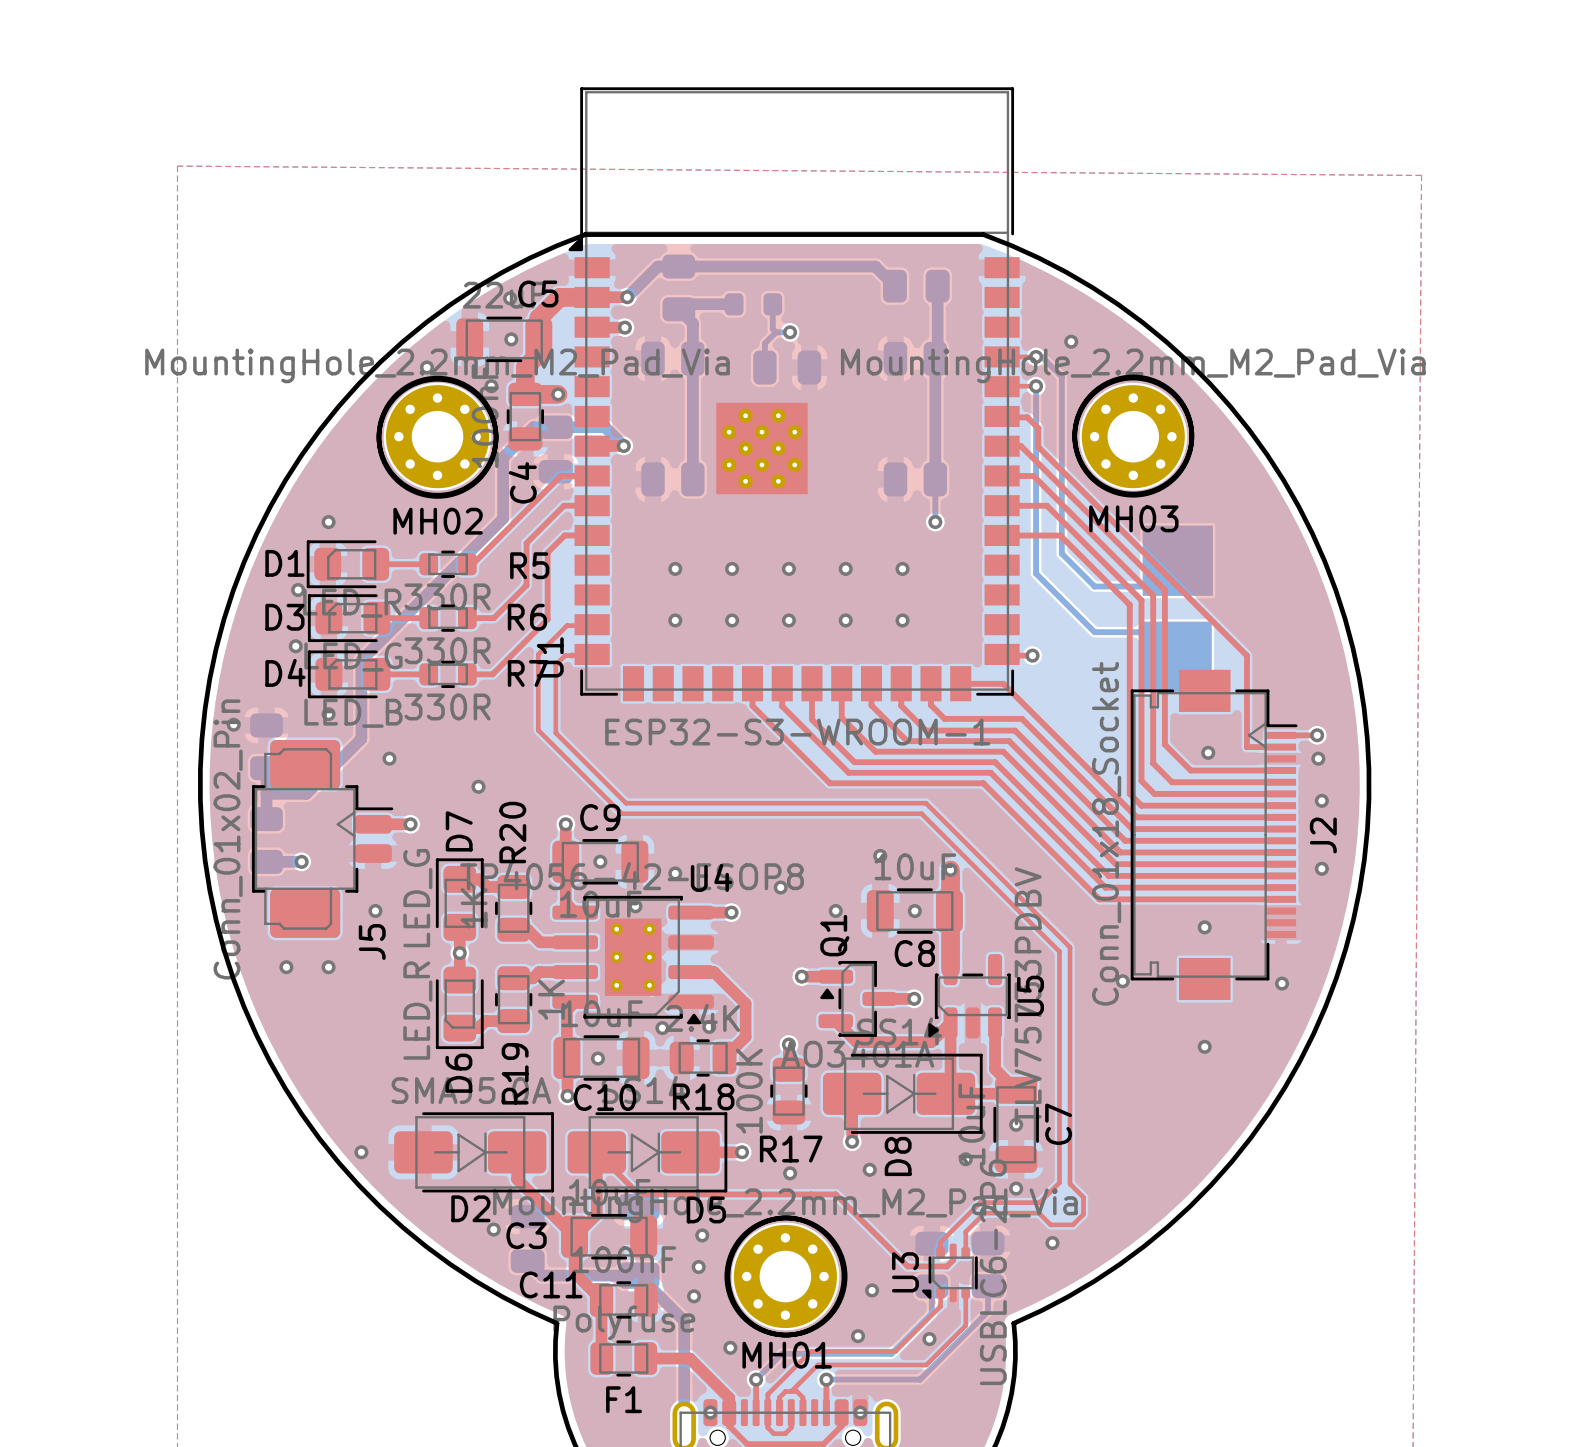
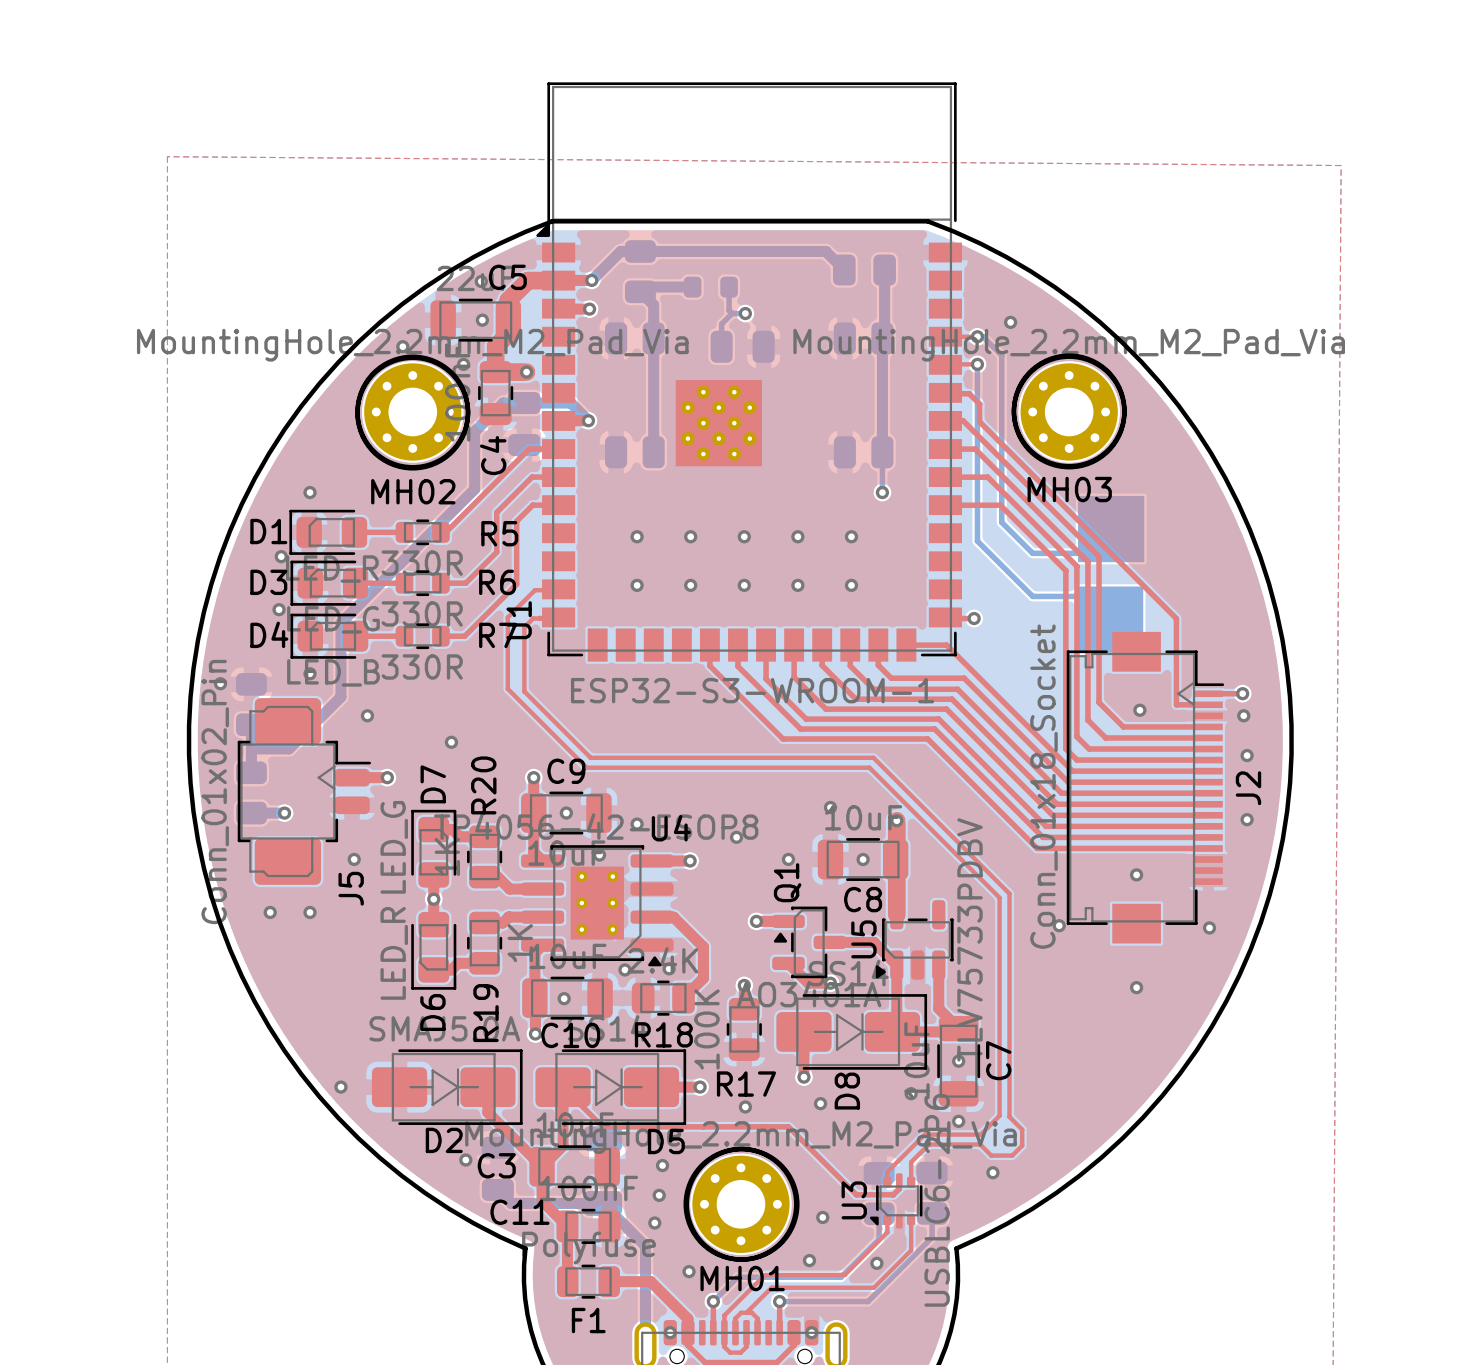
U5 name position: U5 (1030, 995) -> U5 (863, 939)
via position: (914, 998) -> (830, 983)
top track: (950, 1022) (931, 1042) (880, 1042) -> (896, 965) (874, 942) (862, 942)

